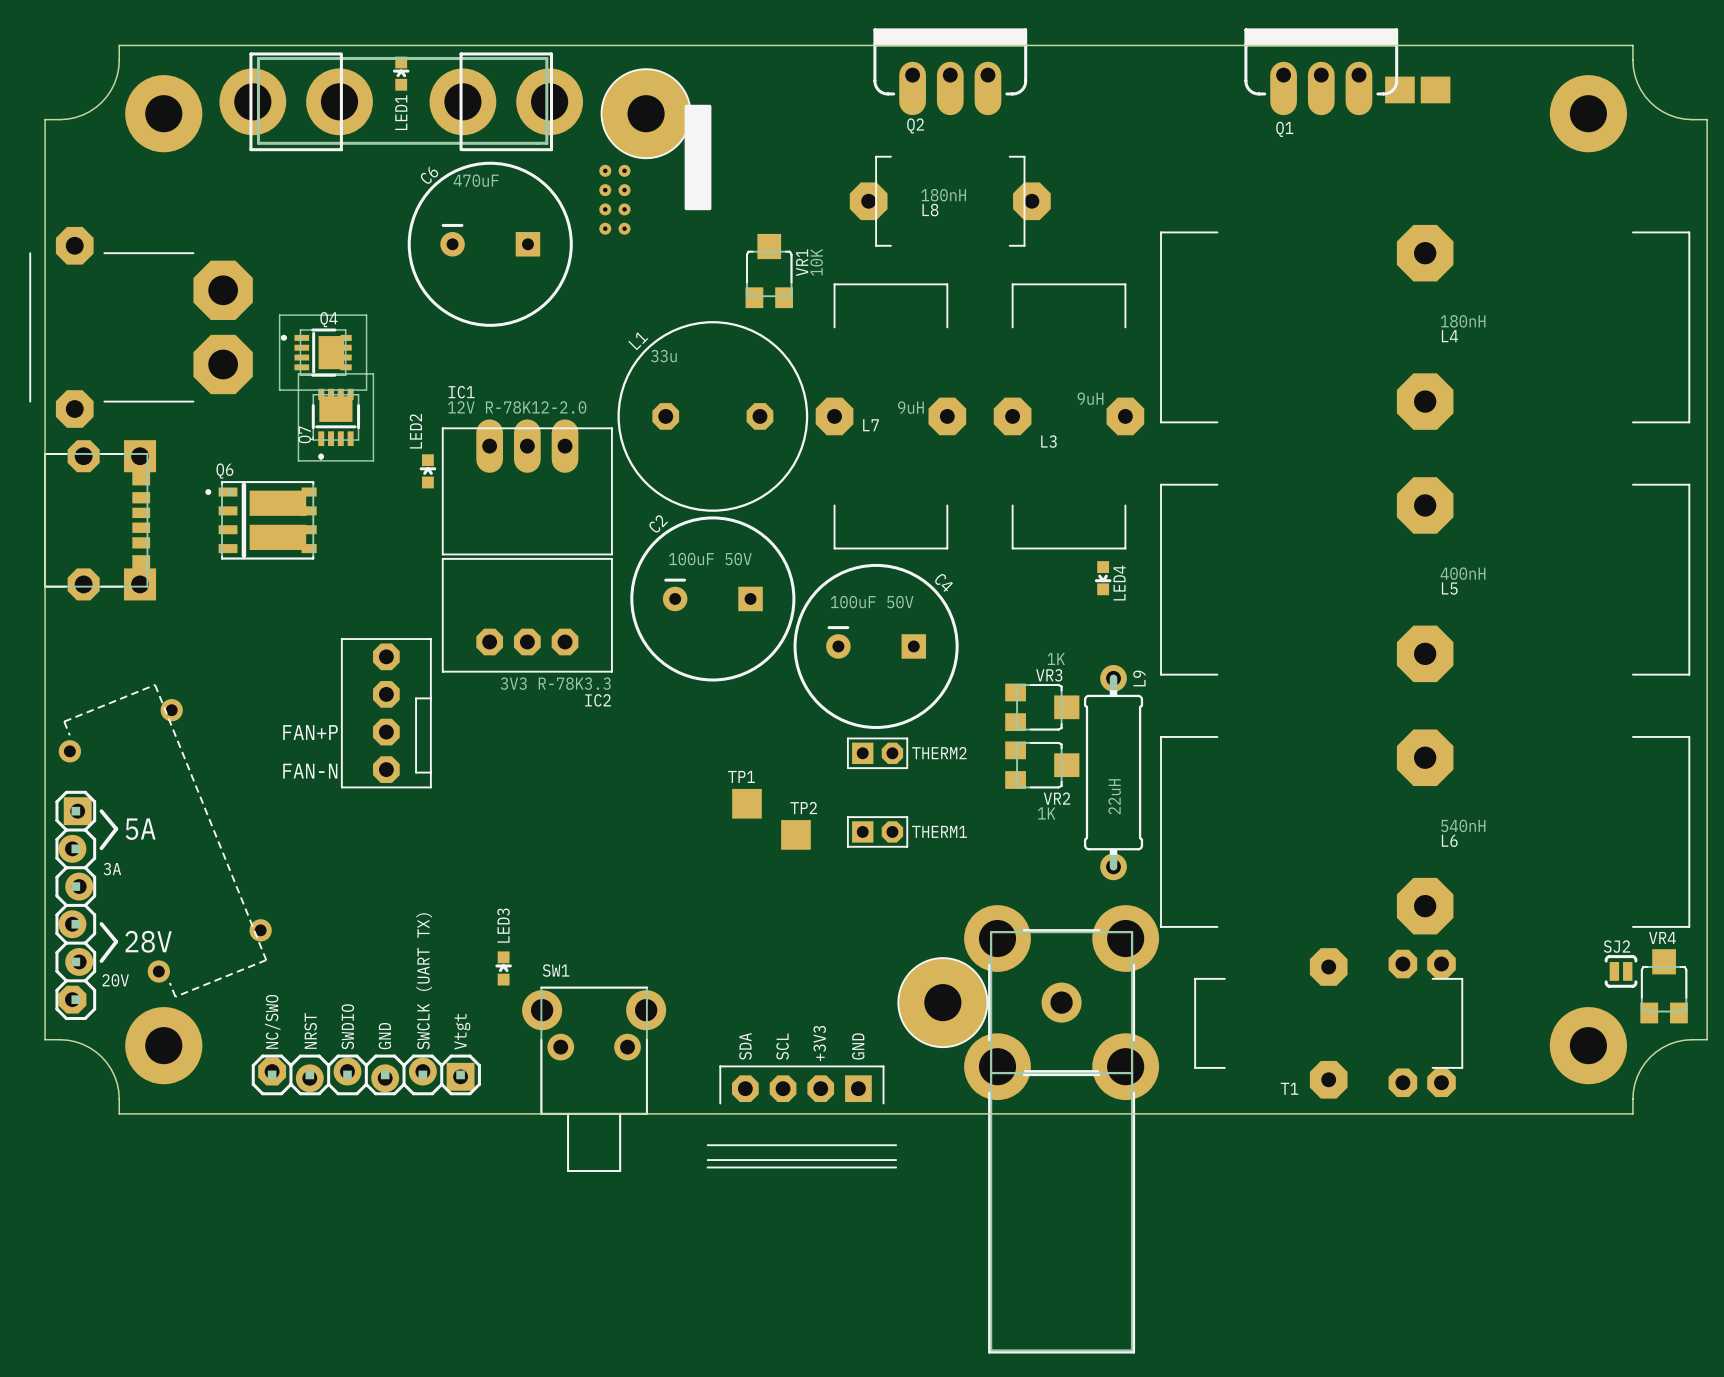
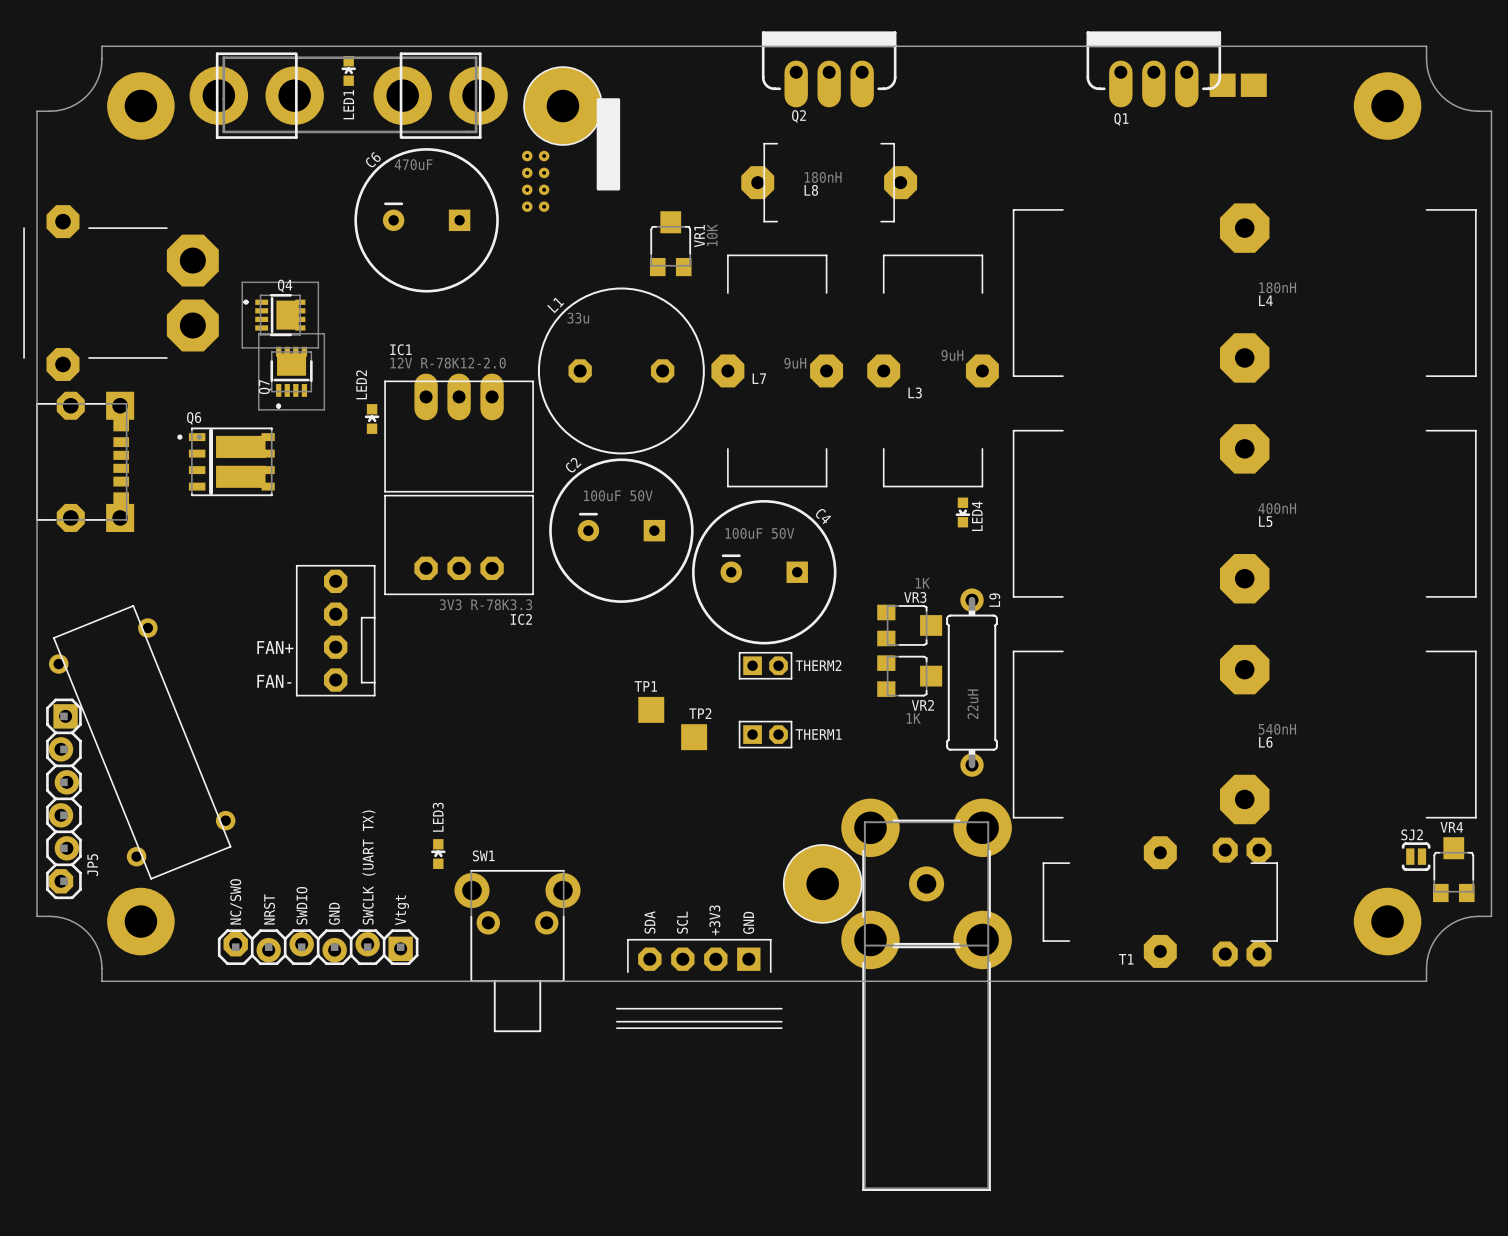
part footprint: [58, 683, 272, 998] -> [49, 605, 236, 880]
text: FAN+P (310, 732) -> FAN+ (275, 647)
text: FAN-N (310, 771) -> FAN- (274, 681)
line: (101, 811) (116, 828) (101, 848) -> none
text: 5A (140, 829) -> none
text: 3A (112, 869) -> none
line: (101, 923) (116, 941) (101, 961) -> none
text: 28V (148, 941) -> none
text: 20V (115, 980) -> none
JP5 name: none -> JP5 (92, 865)

